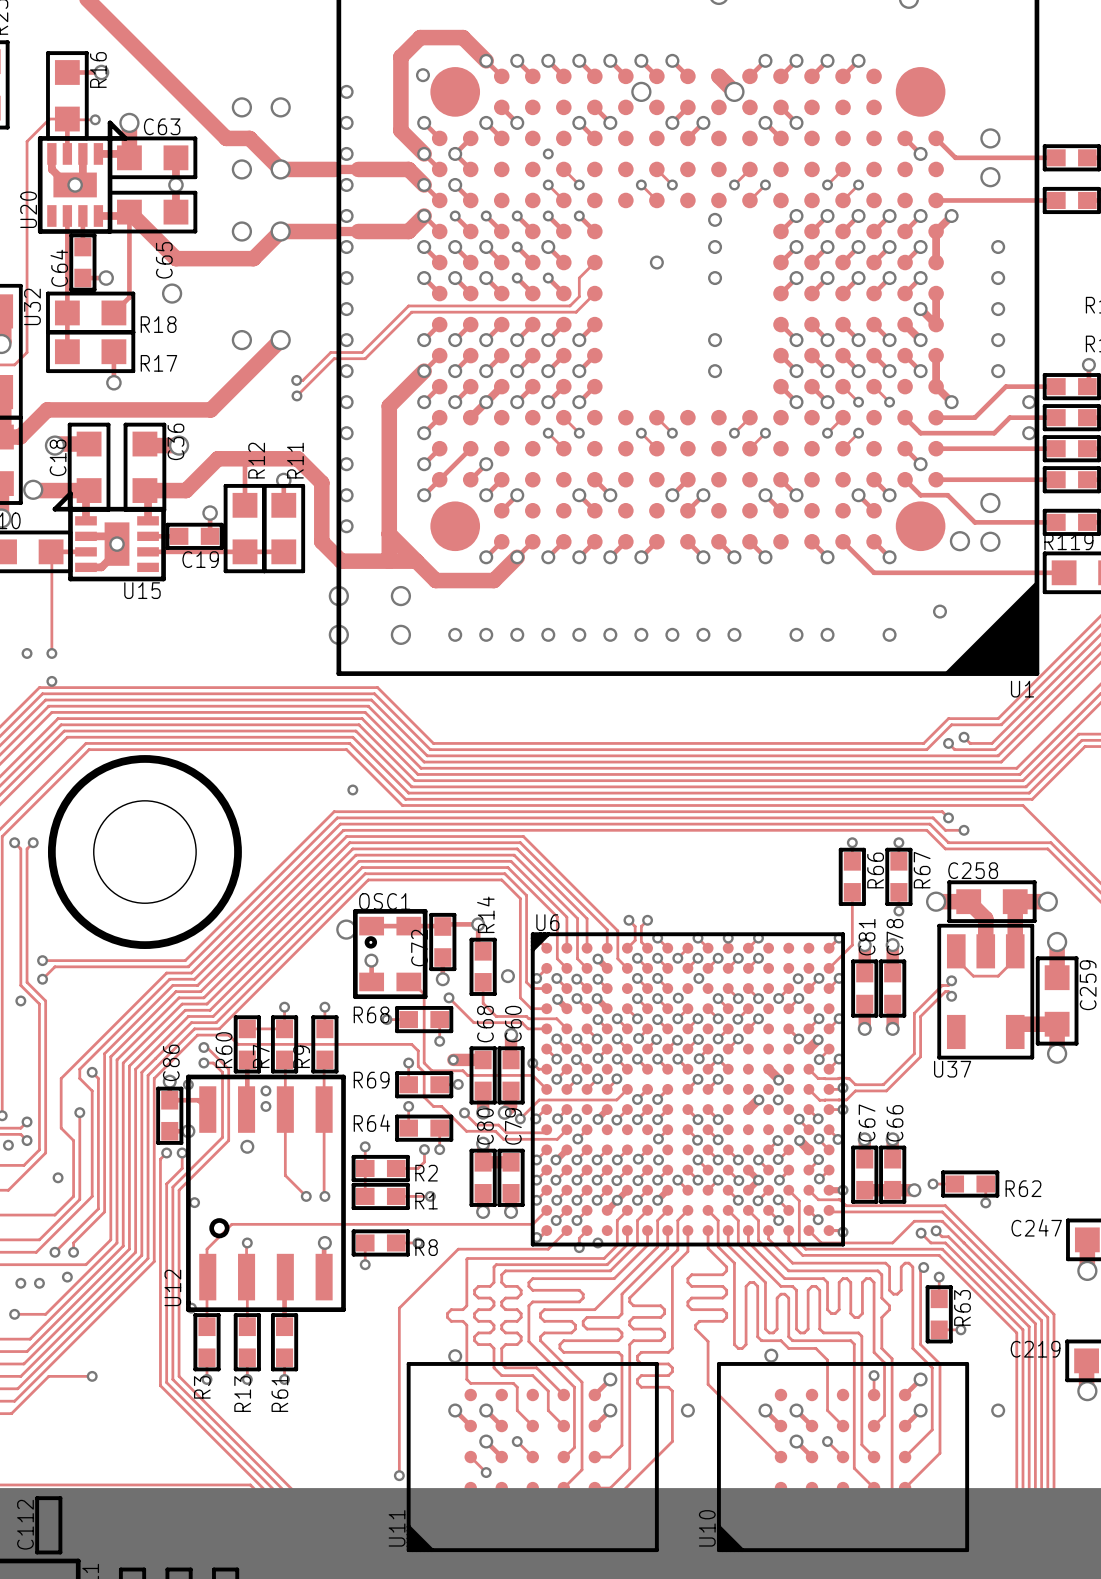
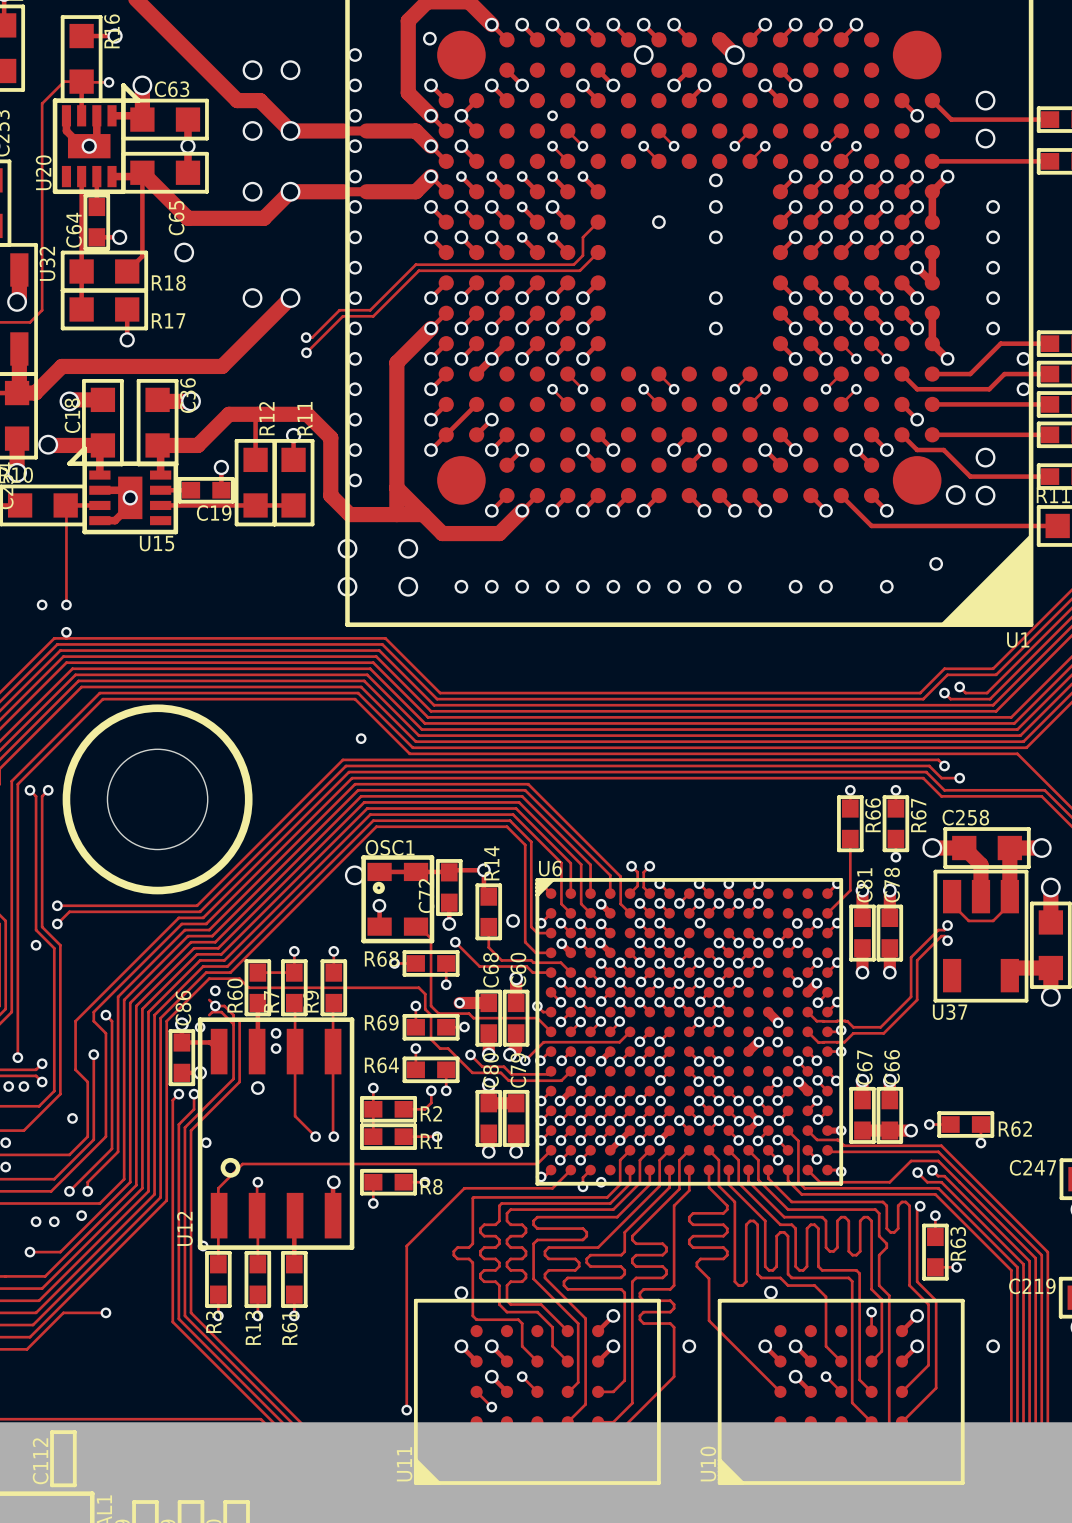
track: (203, 1047) (206, 1047) (228, 1069) (228, 1078) -> none
track: none -> (209, 999) (215, 1006)
track: none -> (209, 1015) (212, 1012) (221, 1012) (233, 1024)

